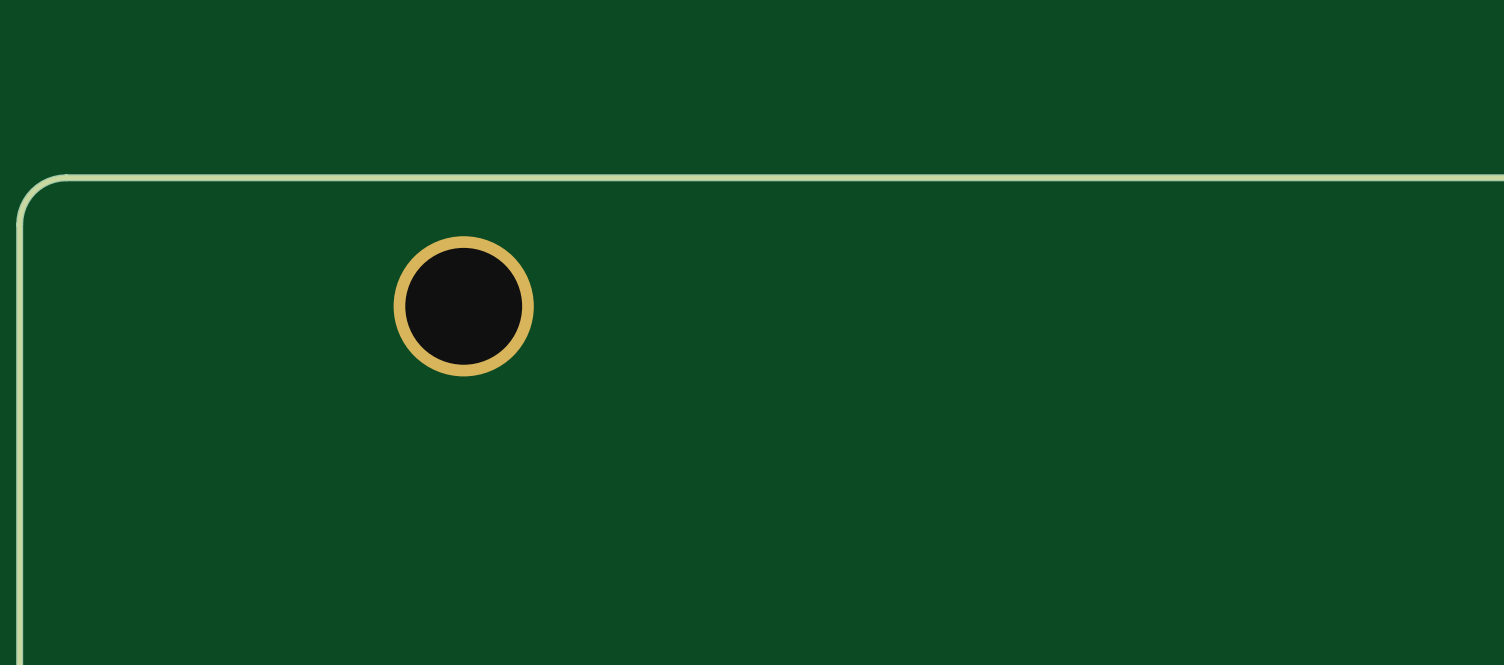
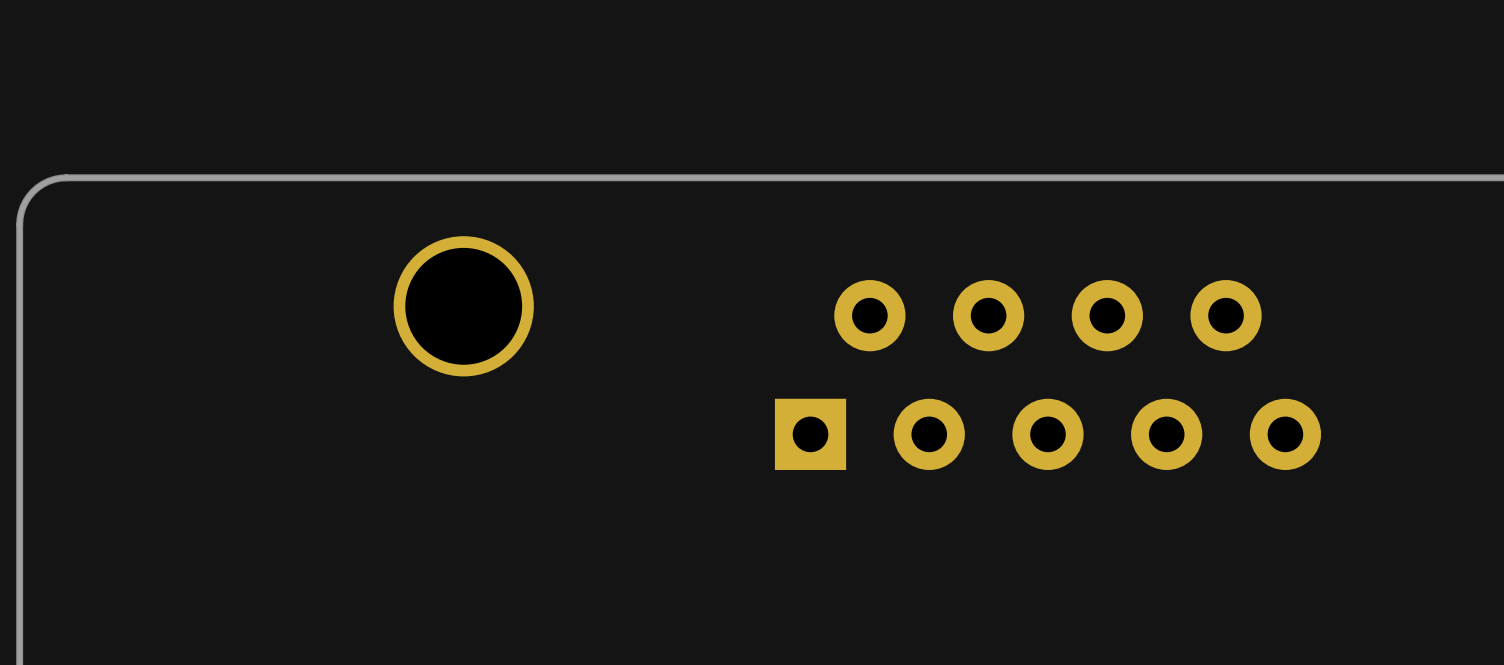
part: none -> (1047, 375)

